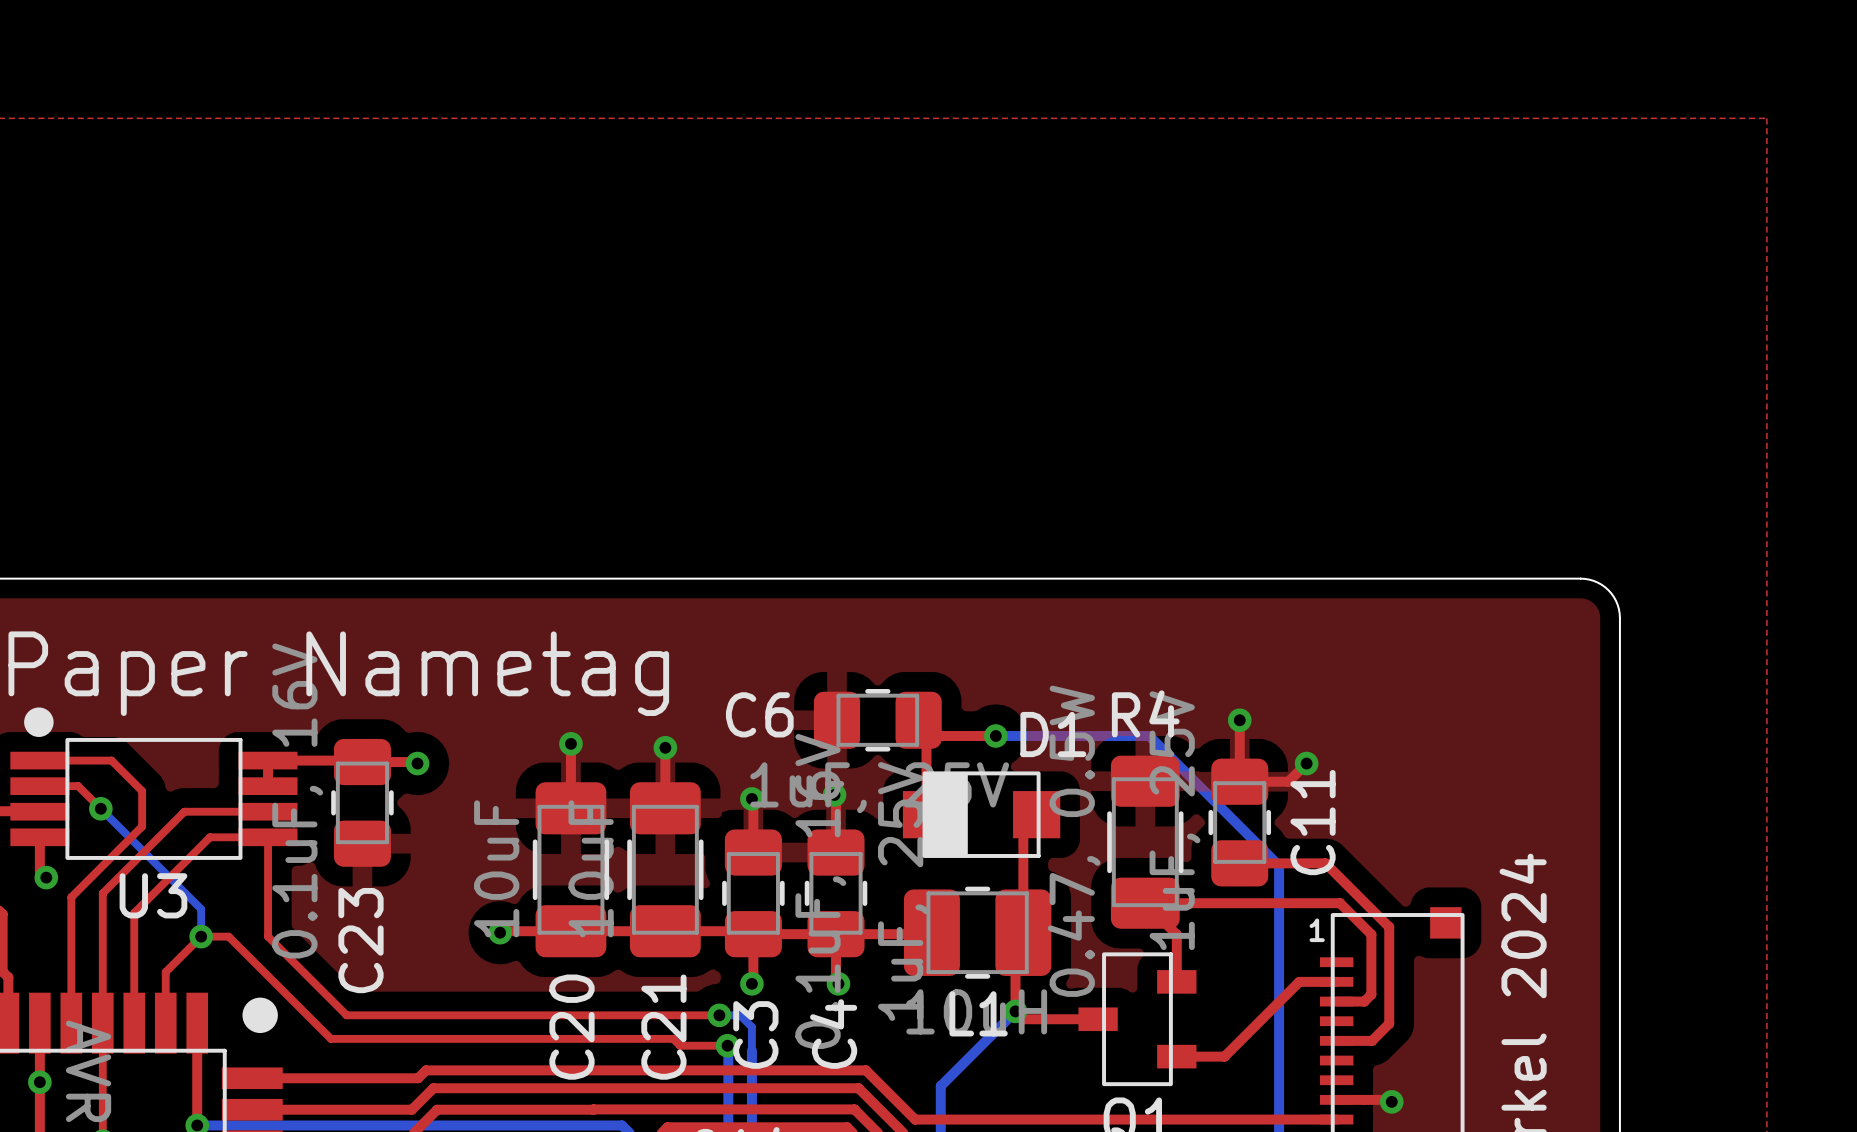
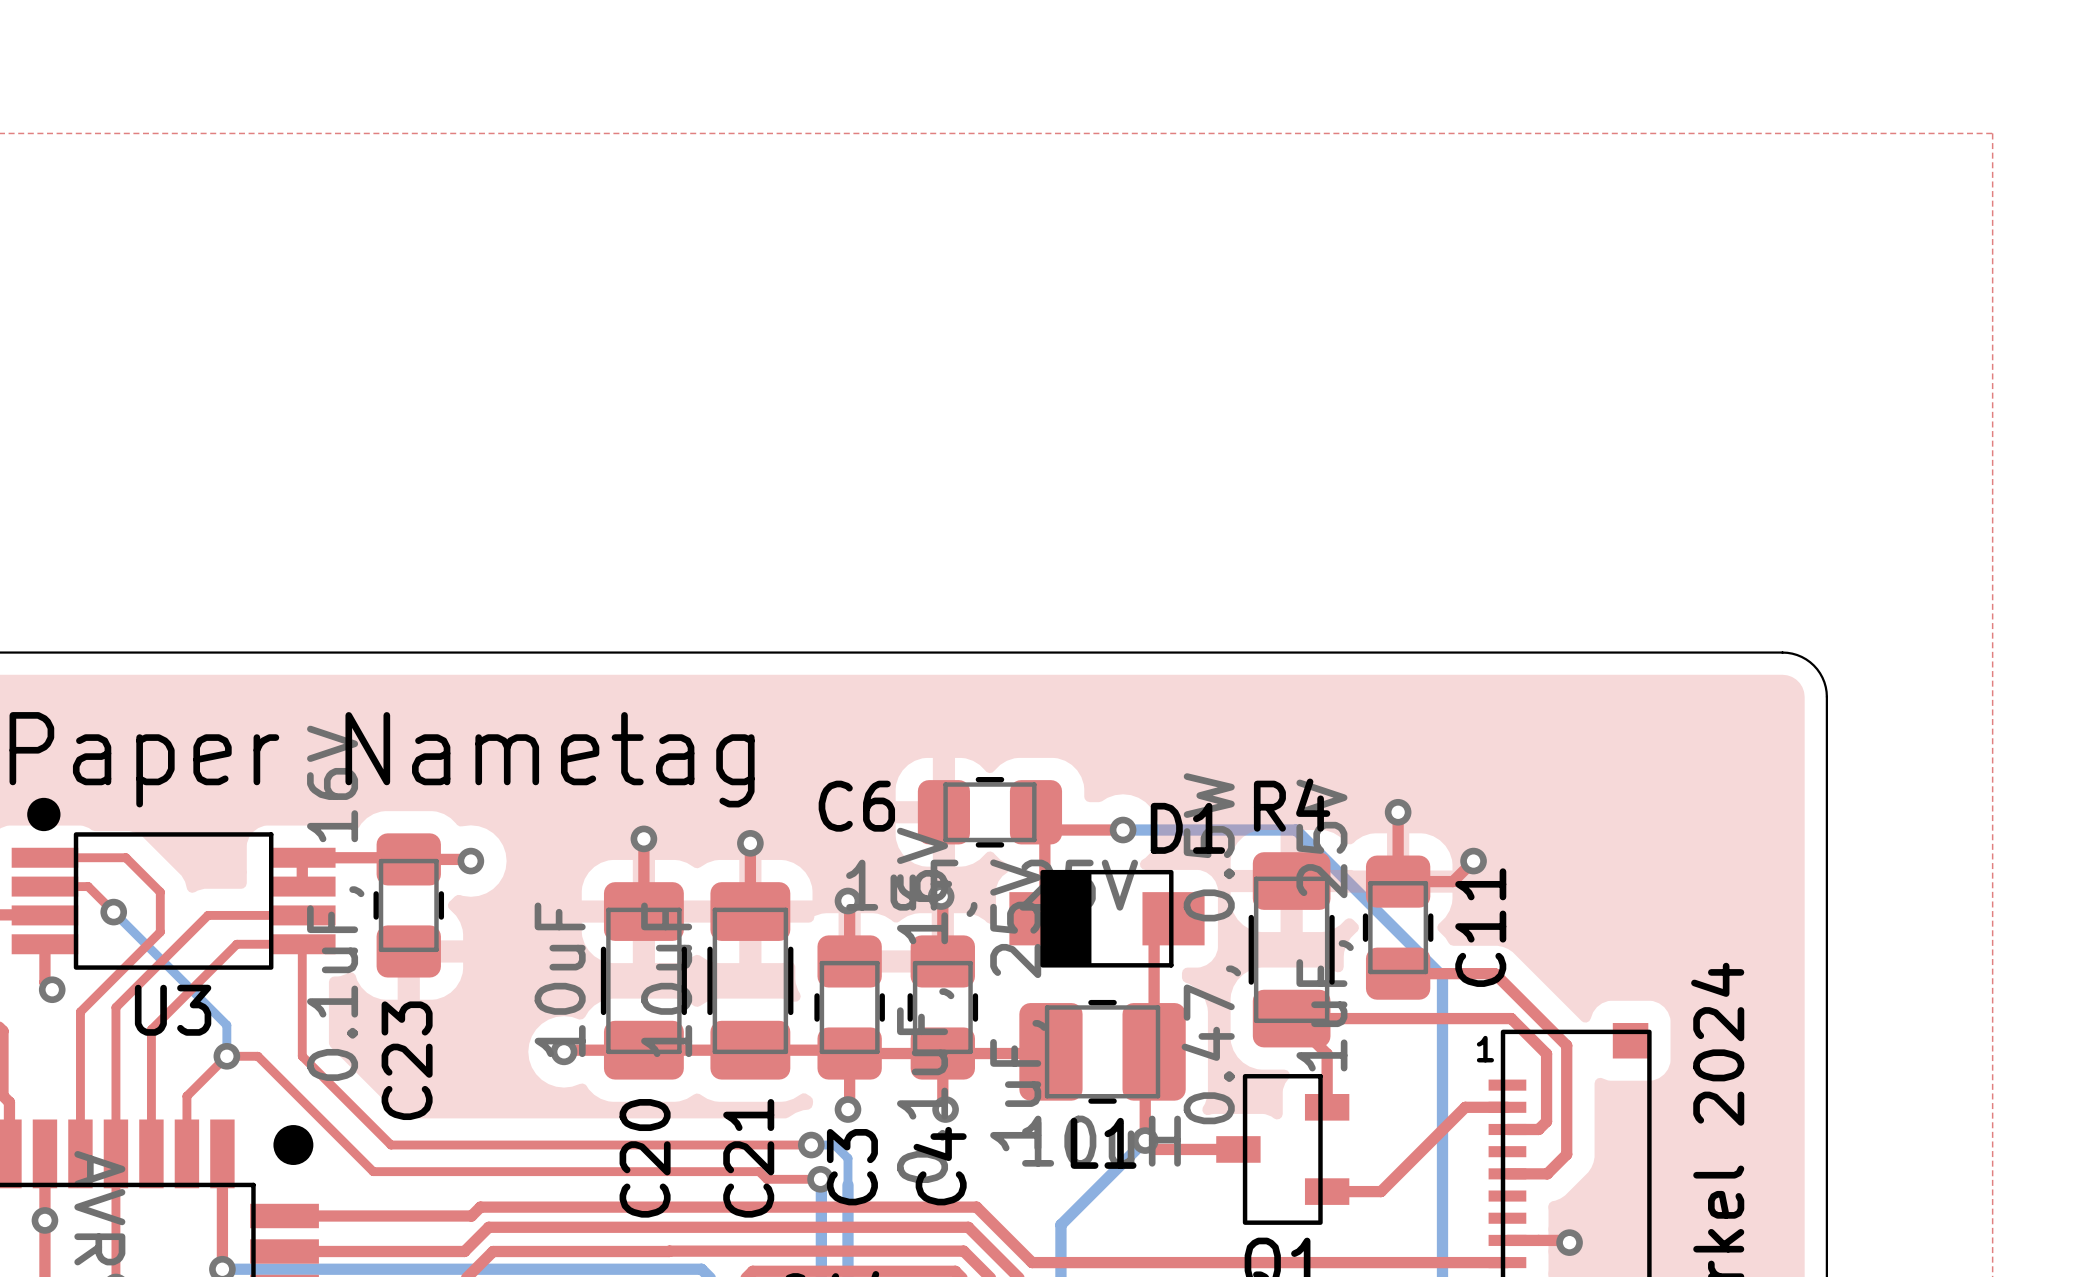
D1 footprint: [902, 771, 1061, 858] -> [1009, 869, 1205, 968]

